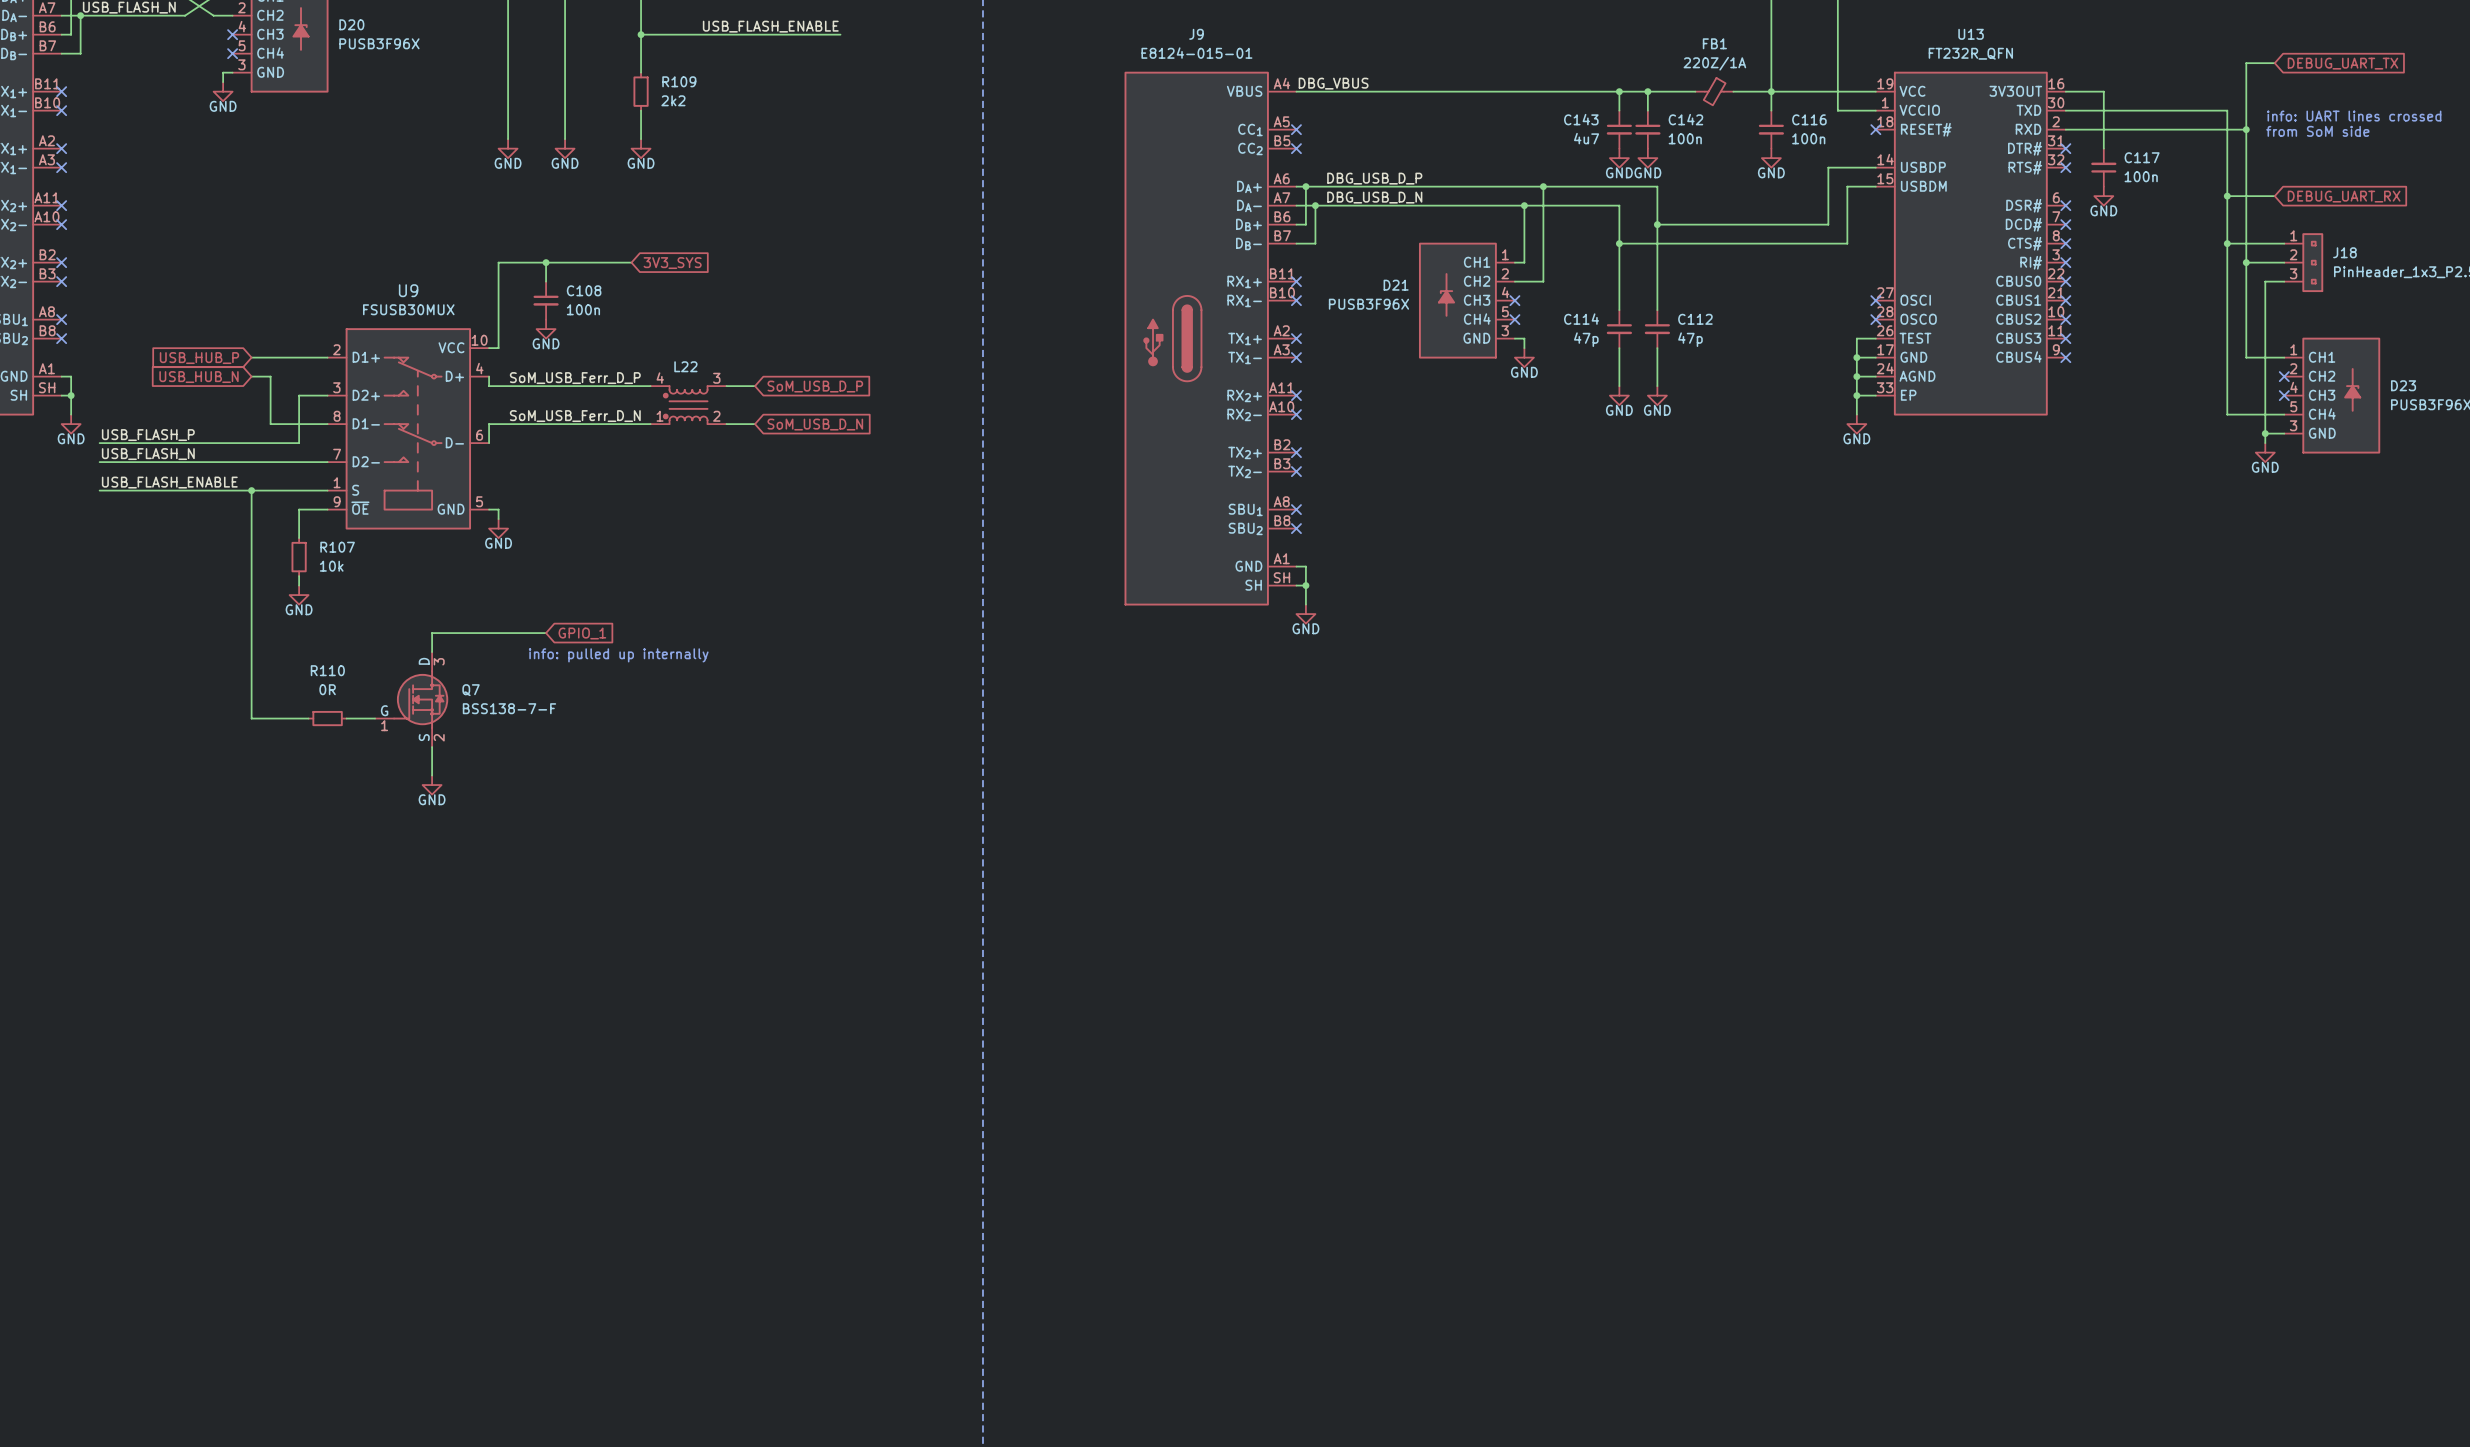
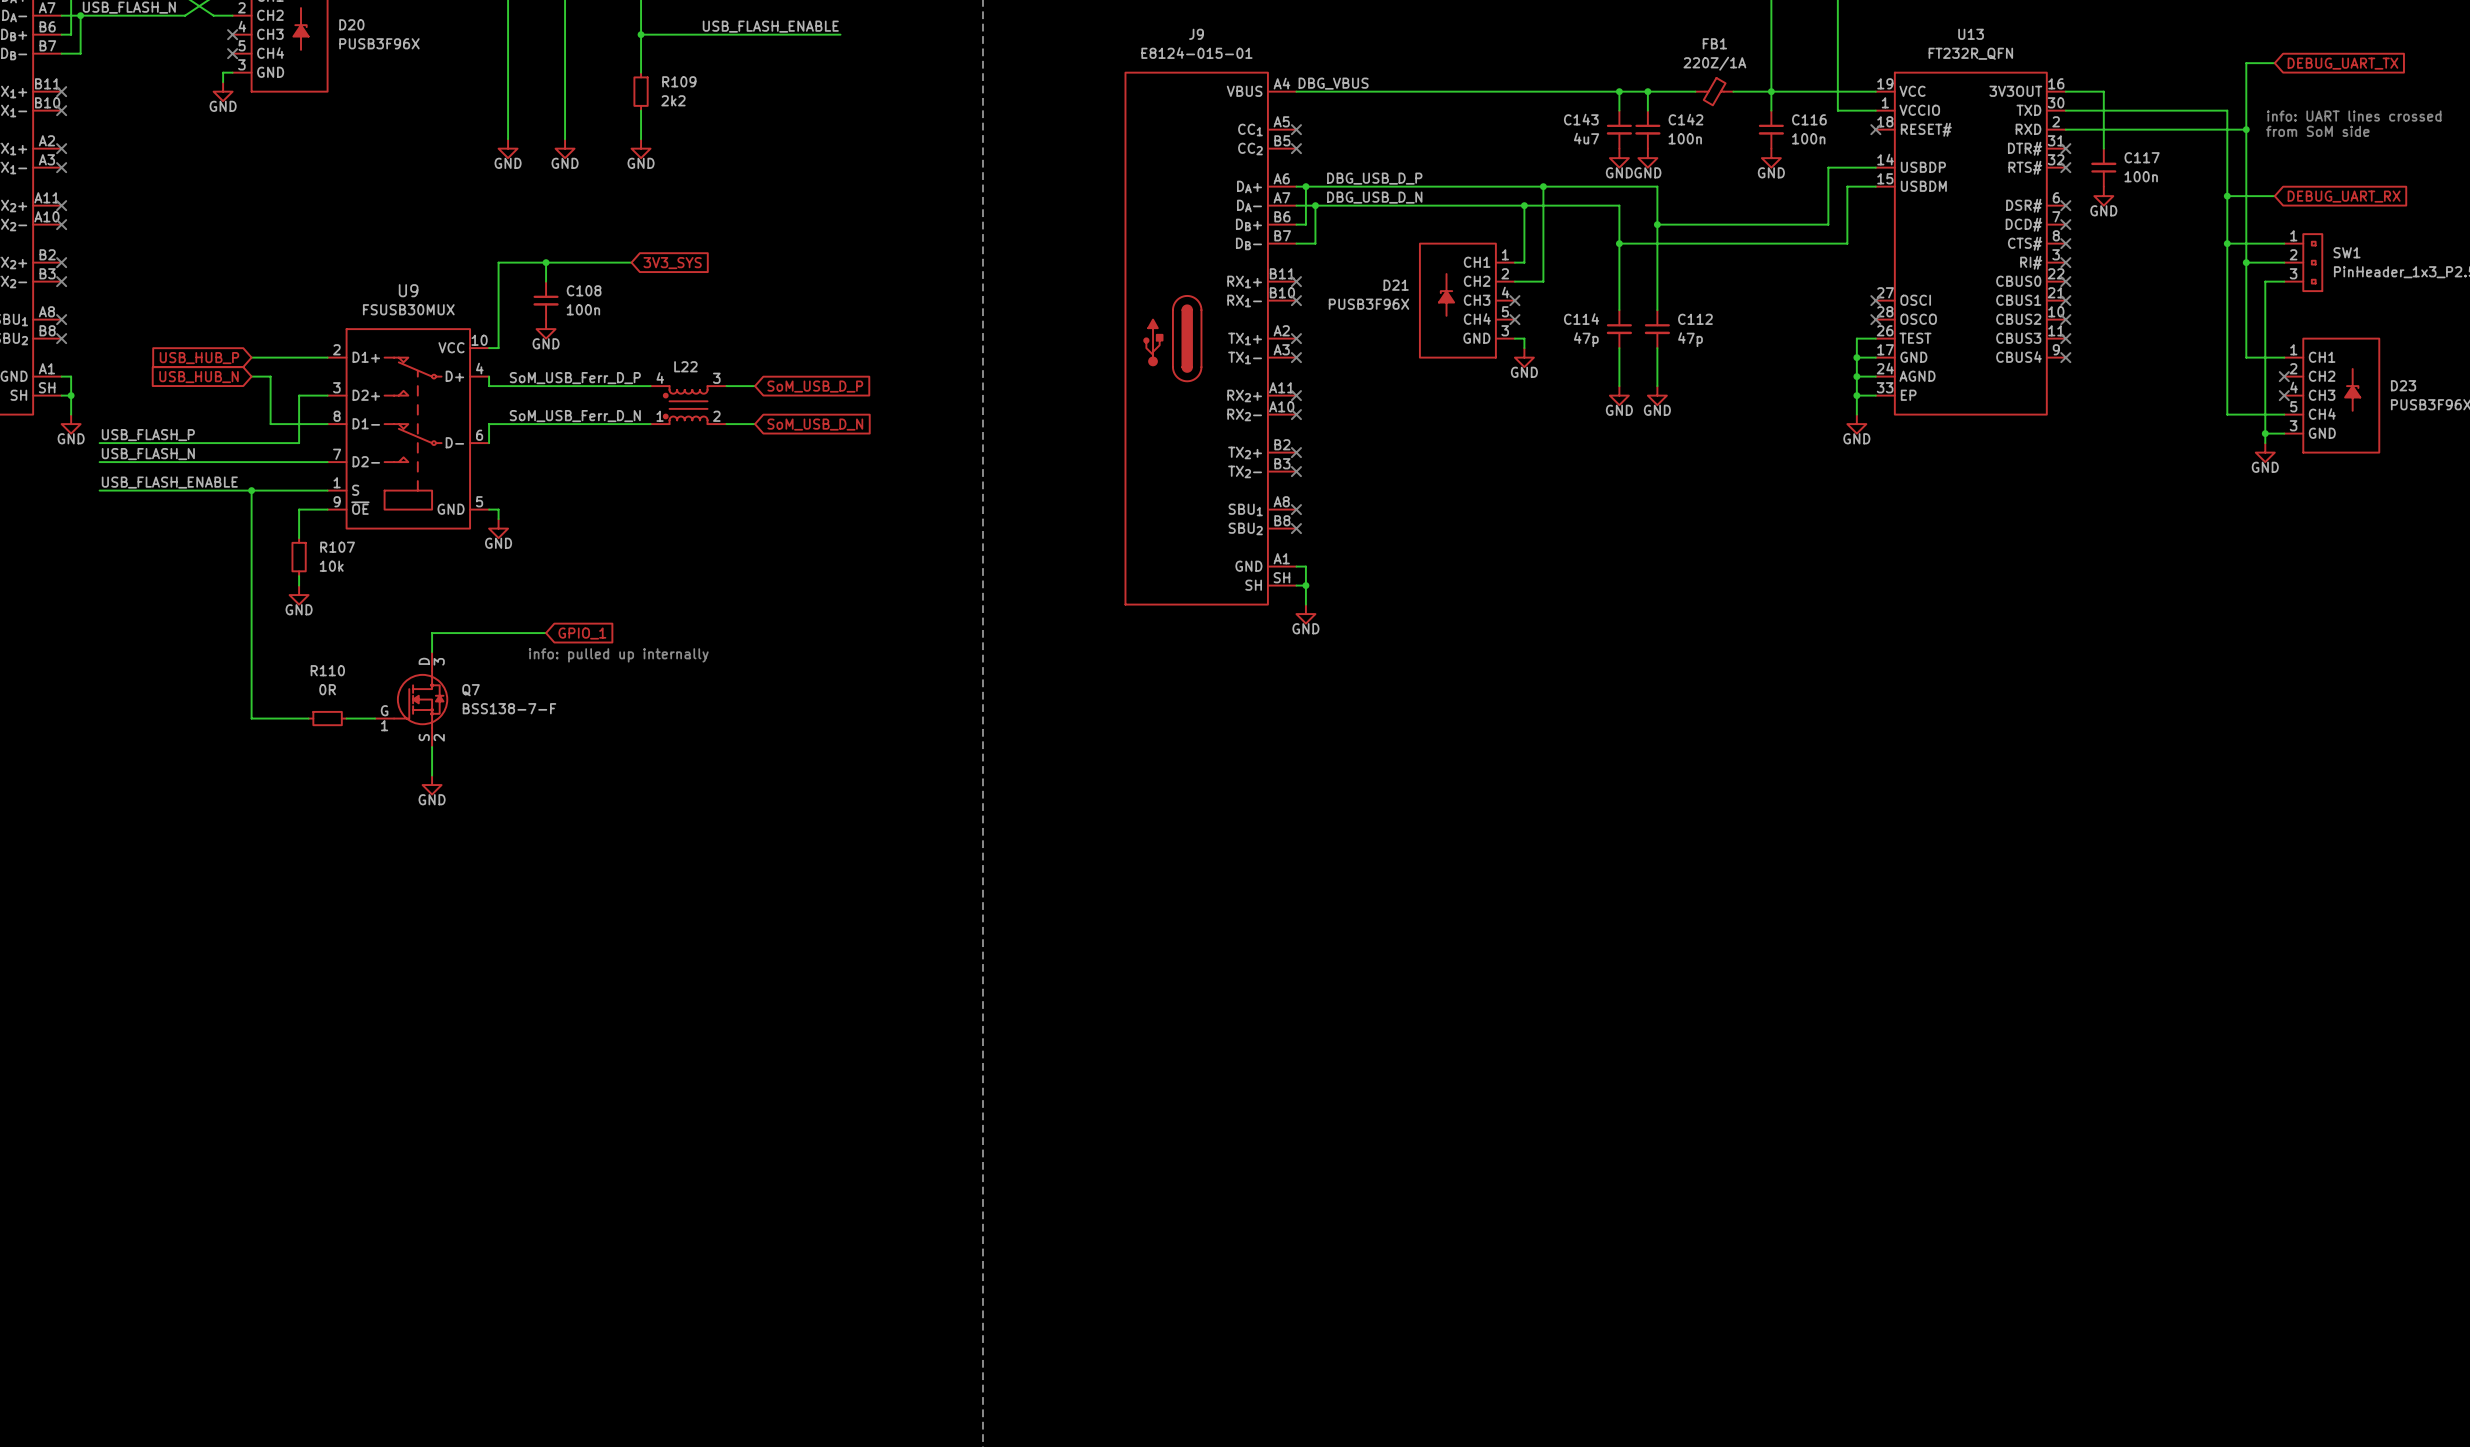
J18 name: J18 (2344, 252) -> SW1 (2346, 252)

